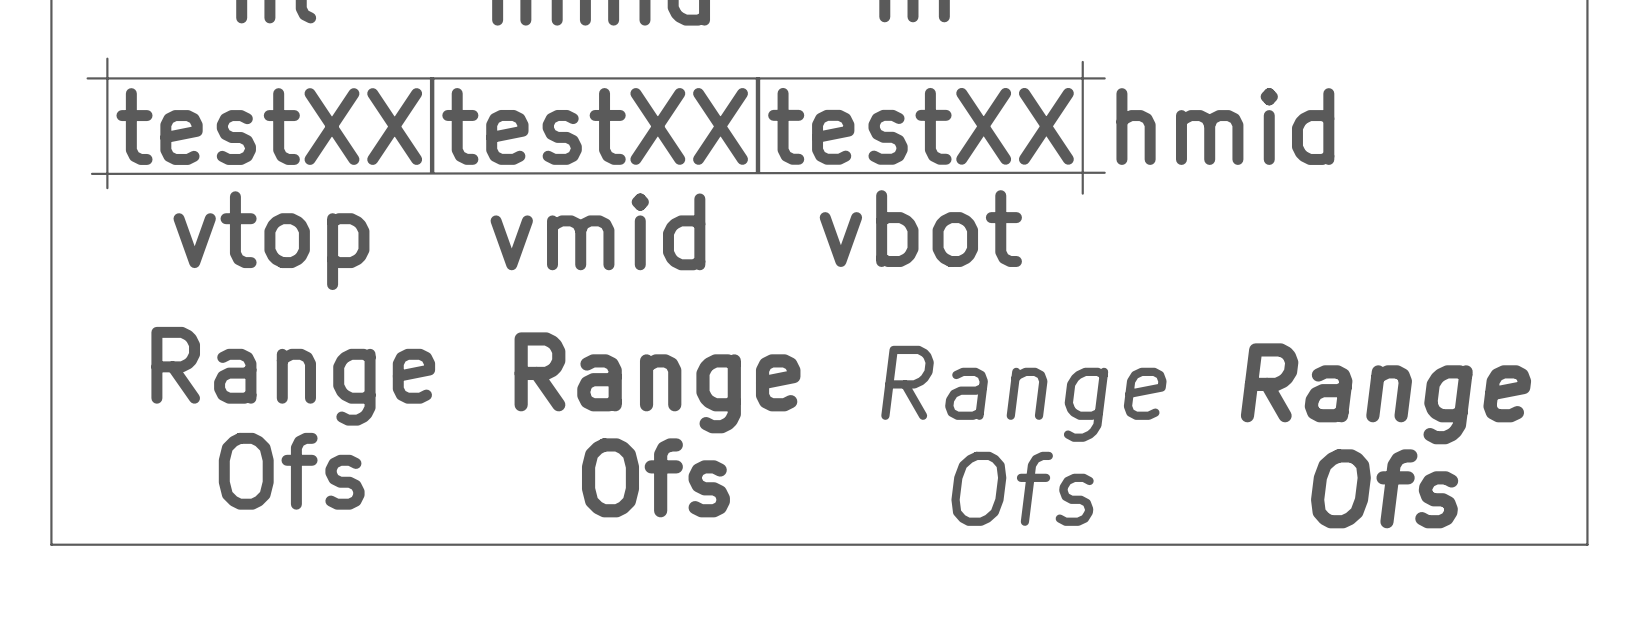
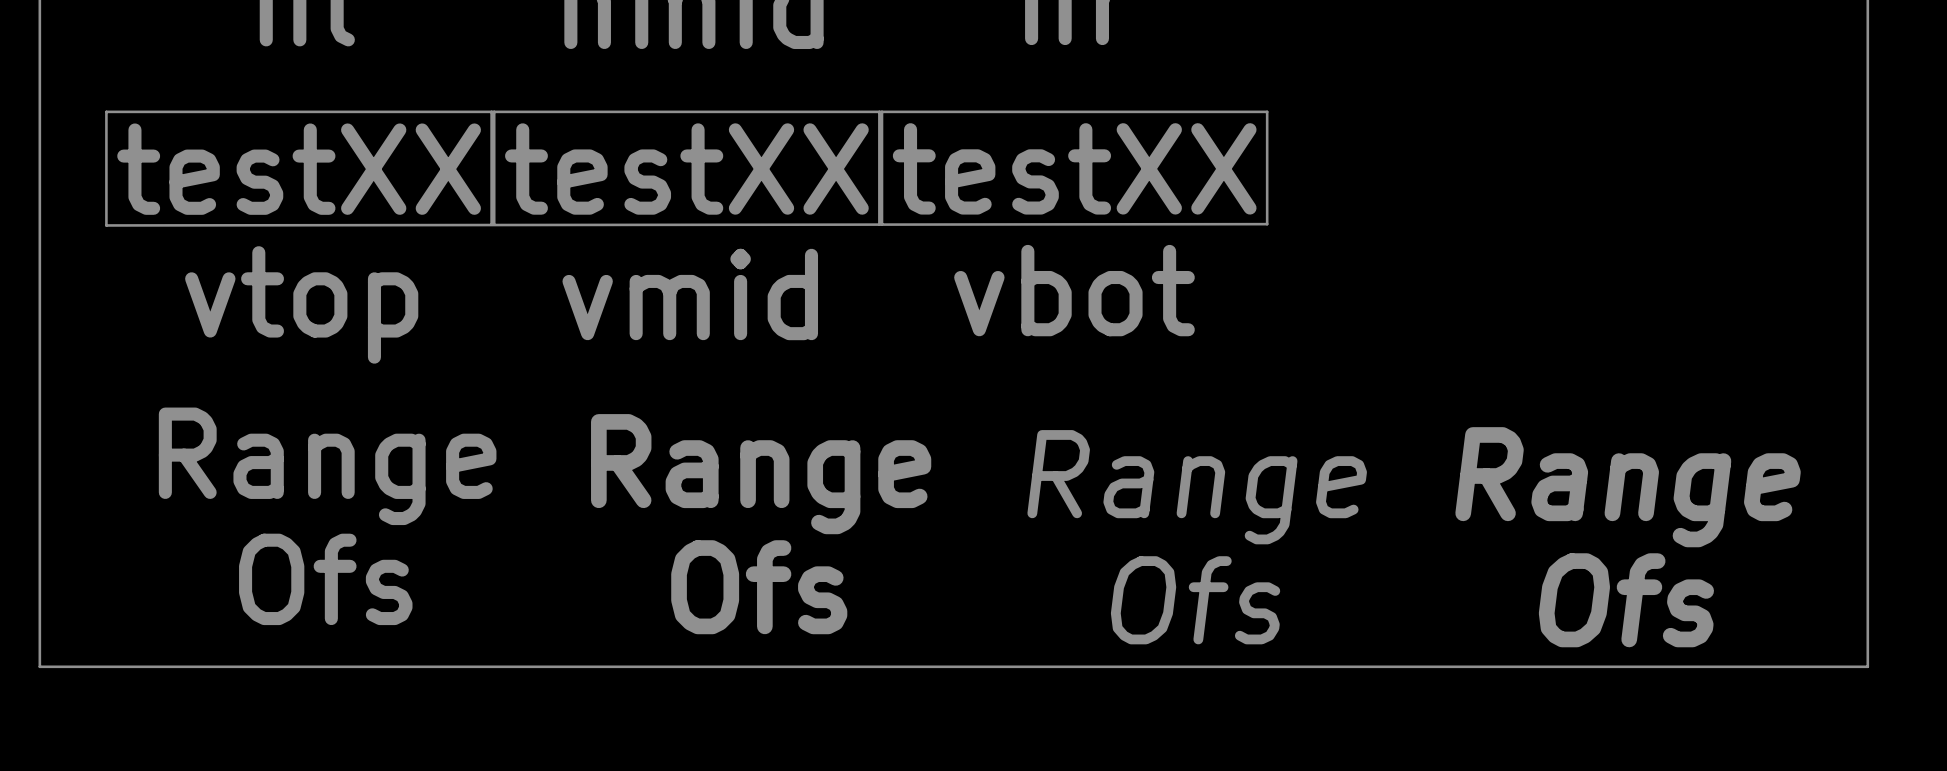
line: (107, 58) (107, 78) (87, 78) -> none
line: (1082, 61) (1082, 78) (1104, 78) -> none
text: hmid (1225, 126) -> none
line: (1104, 172) (1082, 172) (1082, 193) -> none
line: (92, 173) (107, 173) (107, 188) -> none

